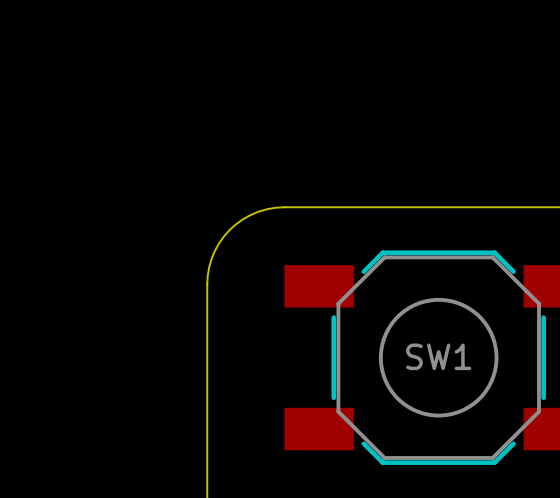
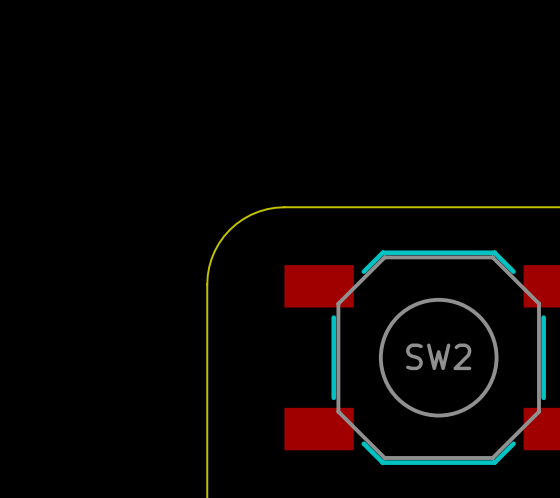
SW1 name: SW1 (438, 356) -> SW2 (438, 356)

